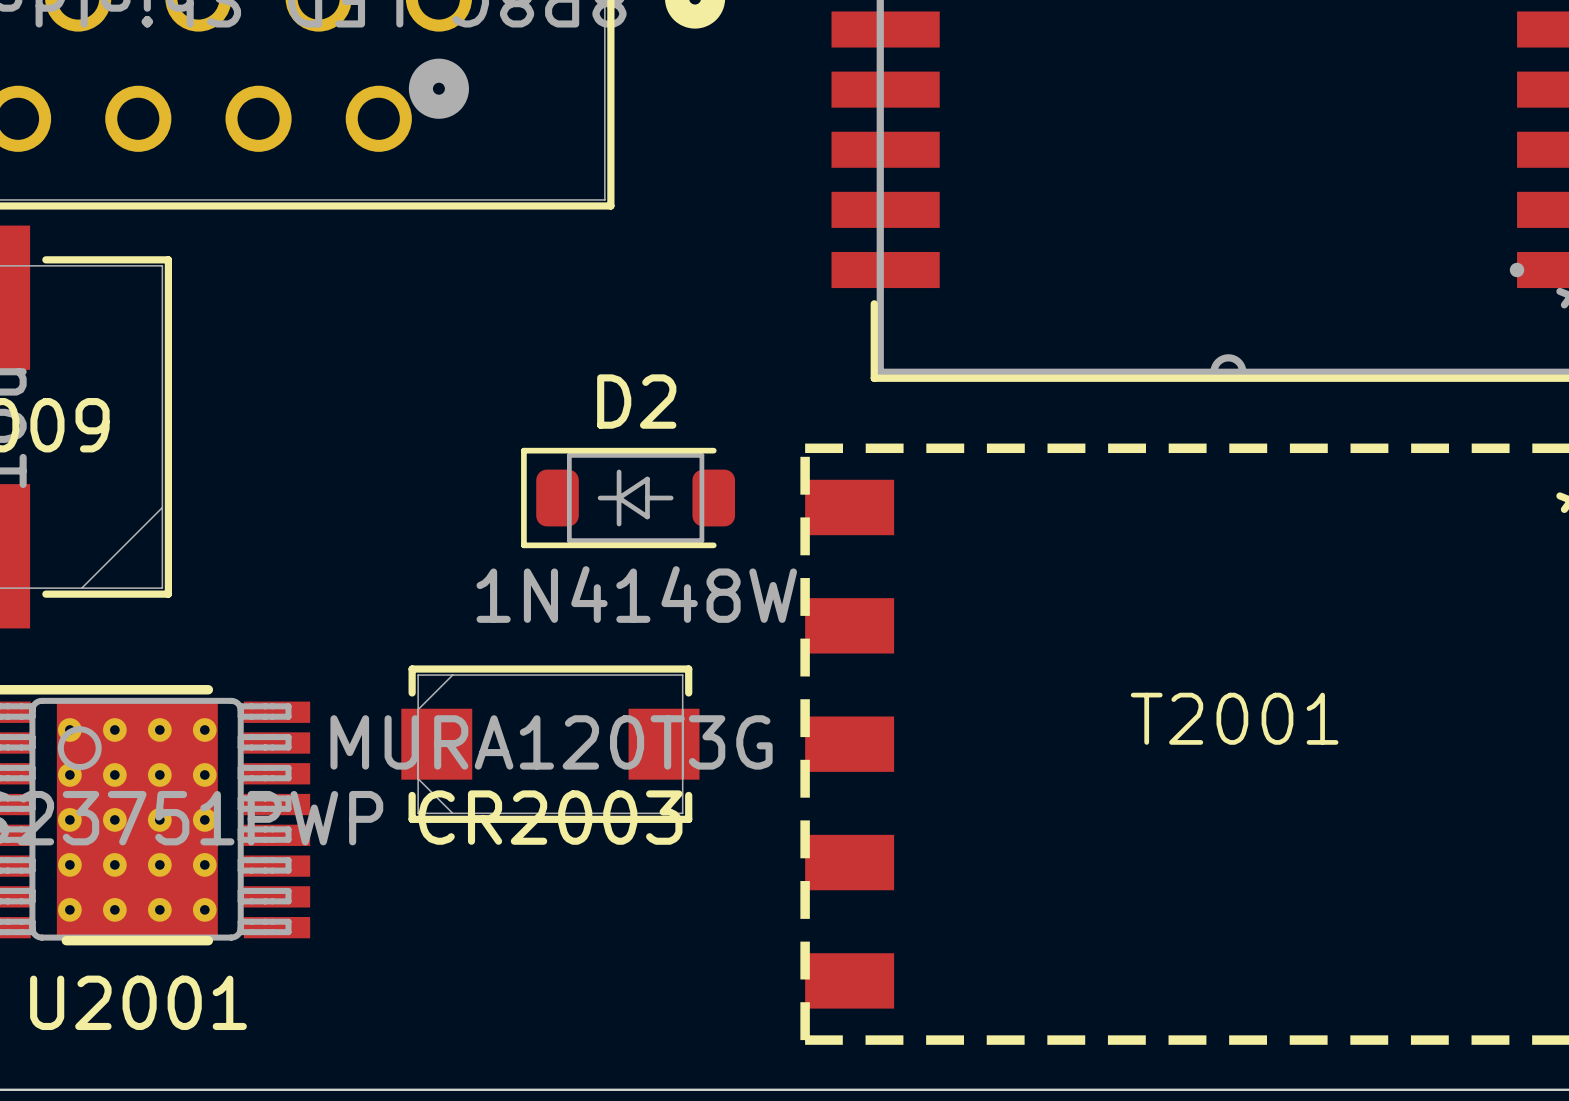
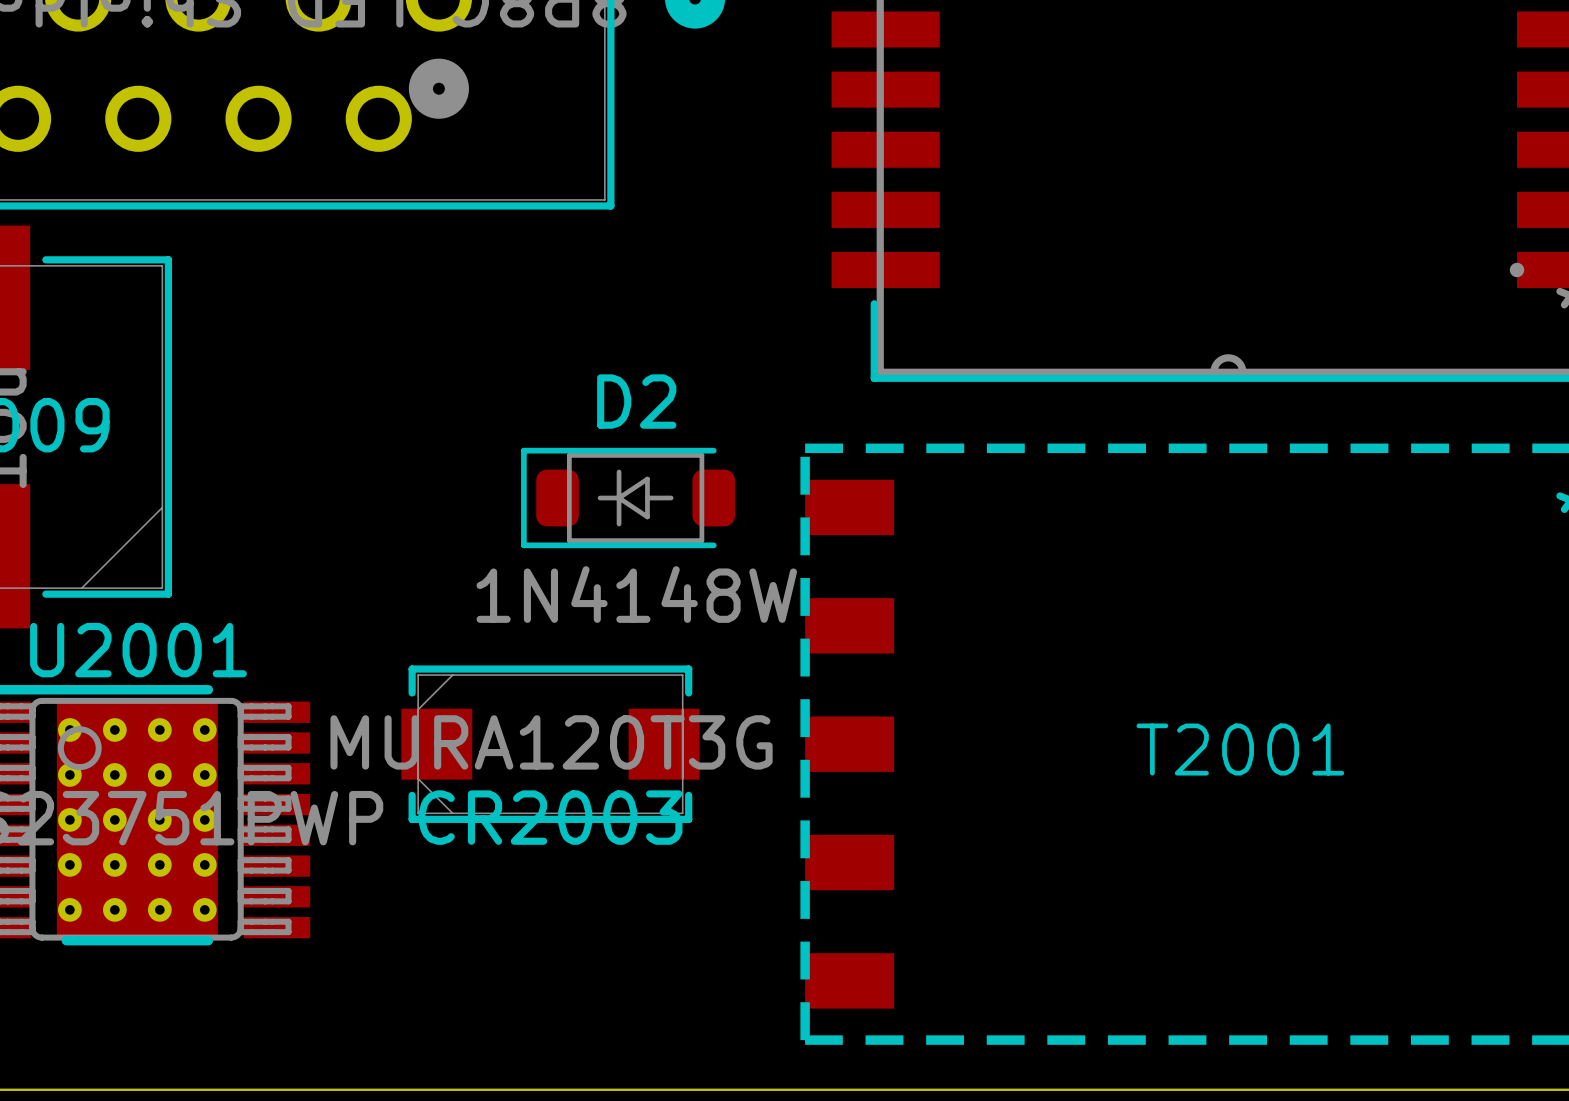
T2001 name position: T2001 (1234, 718) -> T2001 (1240, 749)
U2001 name position: U2001 (138, 1002) -> U2001 (138, 650)

